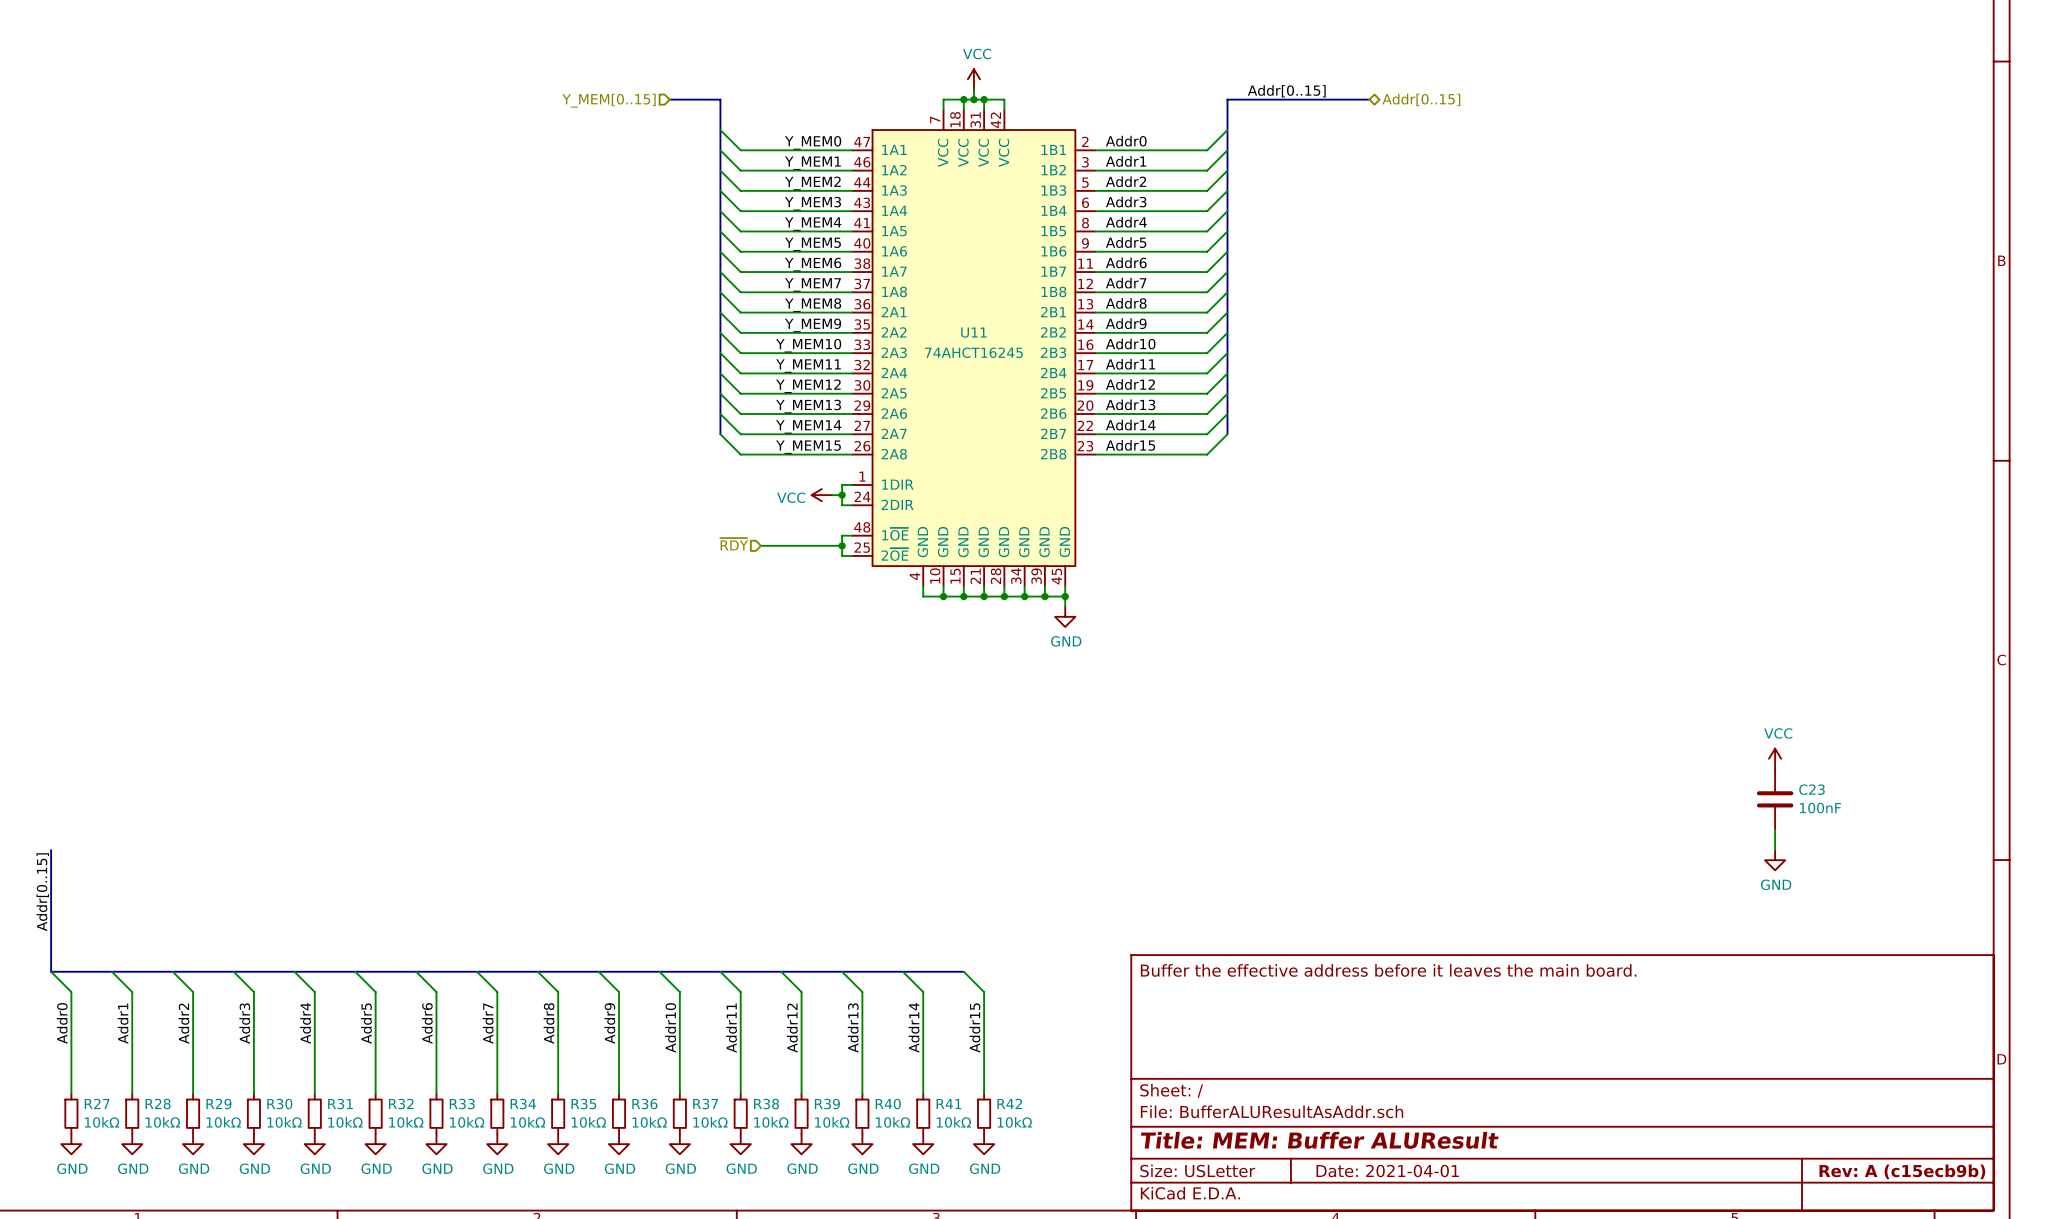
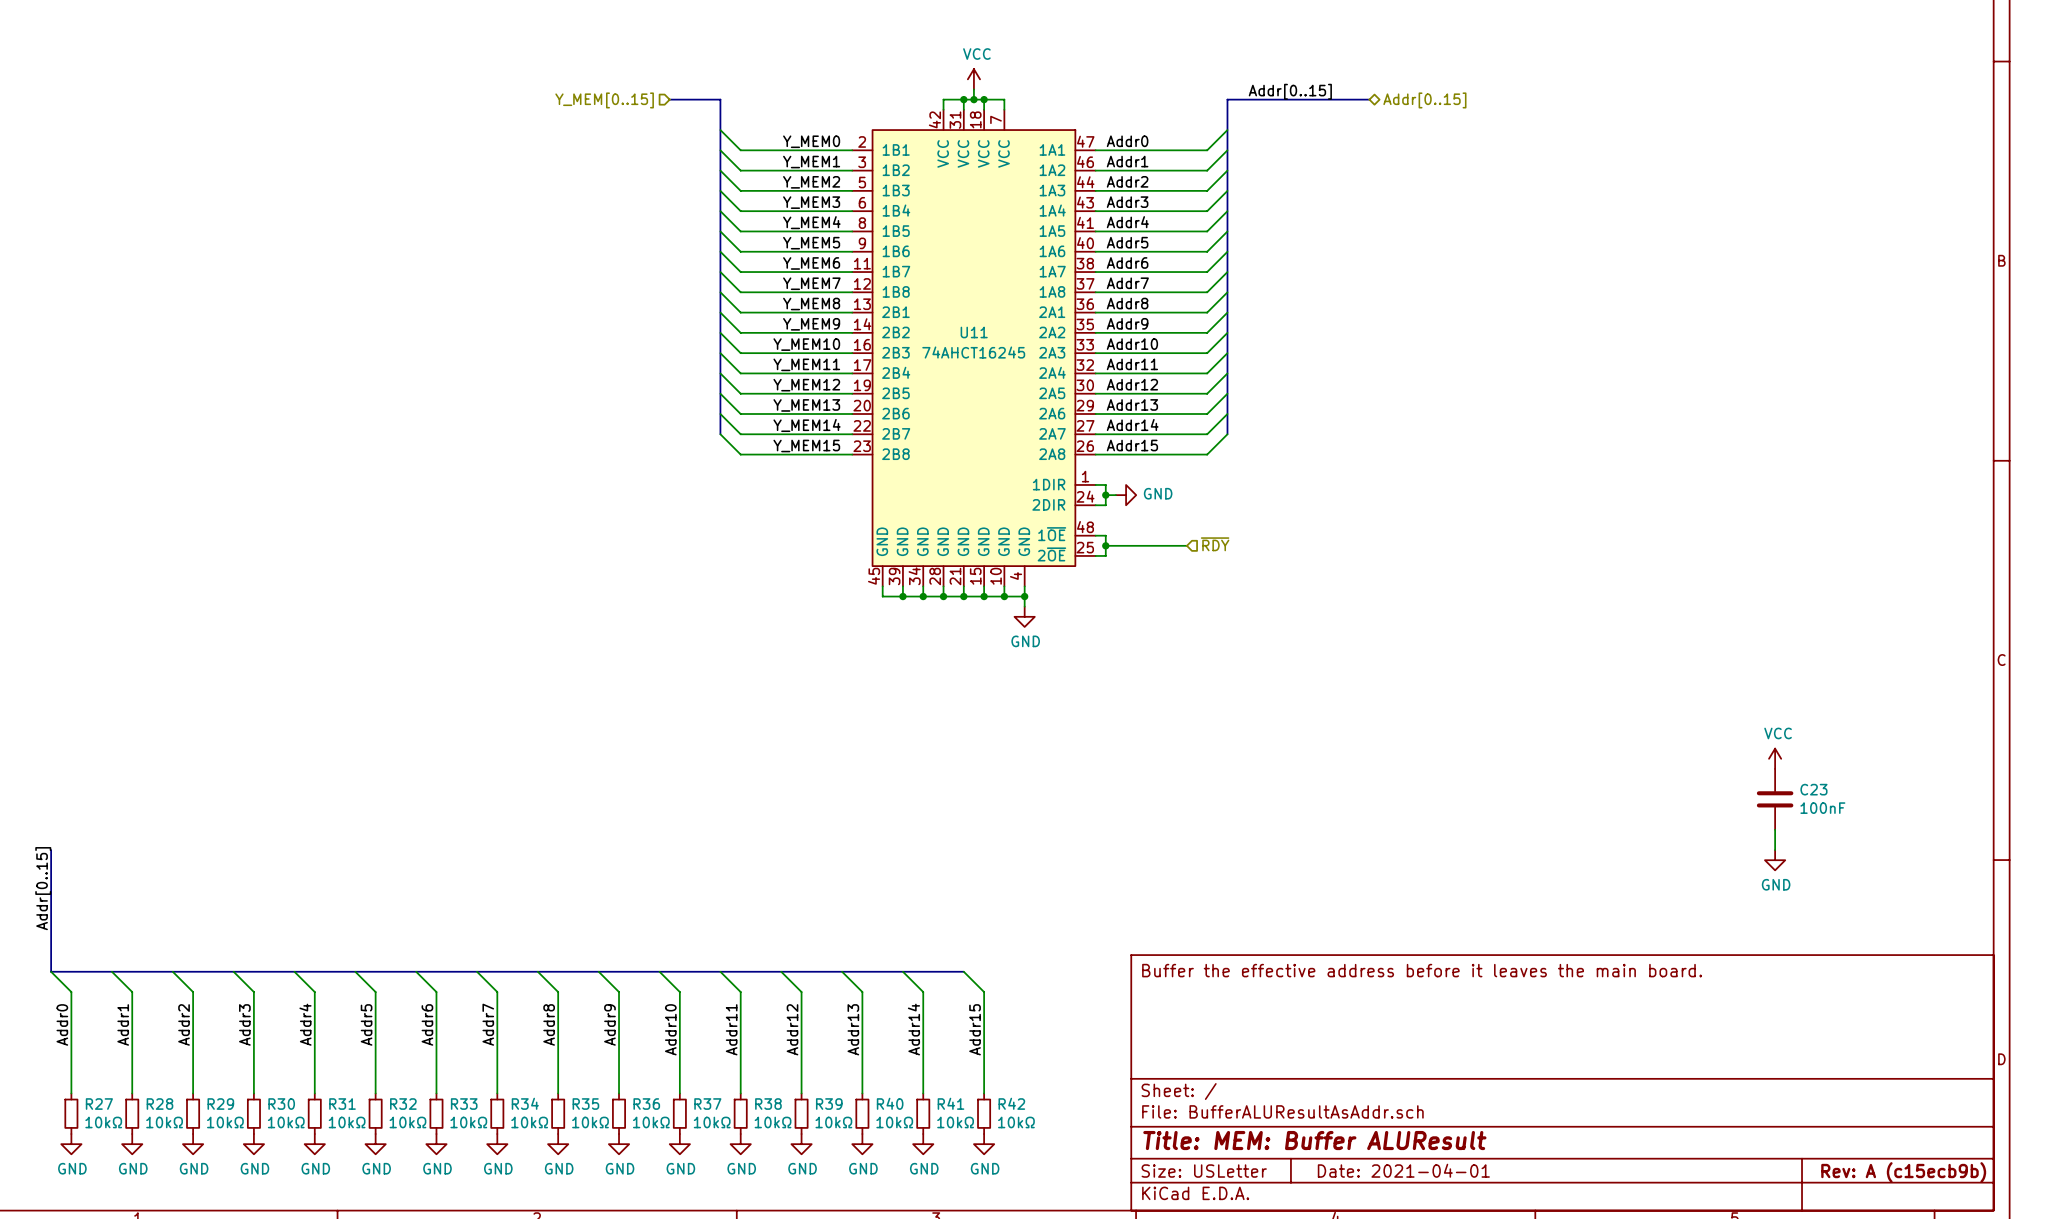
U11 flip: as is (973, 348) -> left-right (973, 348)
wire: (852, 484) (842, 484) (842, 505) (852, 505) -> none
wire: none -> (1095, 484) (1105, 484) (1105, 505) (1095, 505)
power symbol: VCC (821, 495) -> none
wire: (831, 495) (842, 495) -> none
junction: (842, 495) -> none
wire: none -> (1105, 495) (1115, 495)
junction: none -> (1105, 495)
power symbol: none -> GND (1126, 495)
wire: (852, 535) (842, 535) (842, 555) (852, 555) -> none
wire: none -> (1095, 535) (1105, 535) (1105, 555) (1095, 555)
hierarchical label: ~{RDY} (734, 544) -> none
hierarchical label: none -> ~{RDY} (1215, 544)
wire: (760, 545) (842, 545) -> none
junction: (842, 545) -> none
wire: none -> (1105, 545) (1186, 545)
junction: none -> (1105, 545)
wire: none -> (882, 586) (882, 596) (923, 596)
wire: (1044, 586) (1044, 596) -> (902, 586) (902, 596)
wire: (1065, 586) (1065, 606) -> none
junction: none -> (902, 596)
junction: none -> (923, 596)
wire: (1024, 596) (1065, 596) -> (1024, 596) (1024, 606)
junction: (1044, 596) -> none
junction: (1065, 596) -> none
power symbol position: GND (1065, 616) -> GND (1024, 616)

